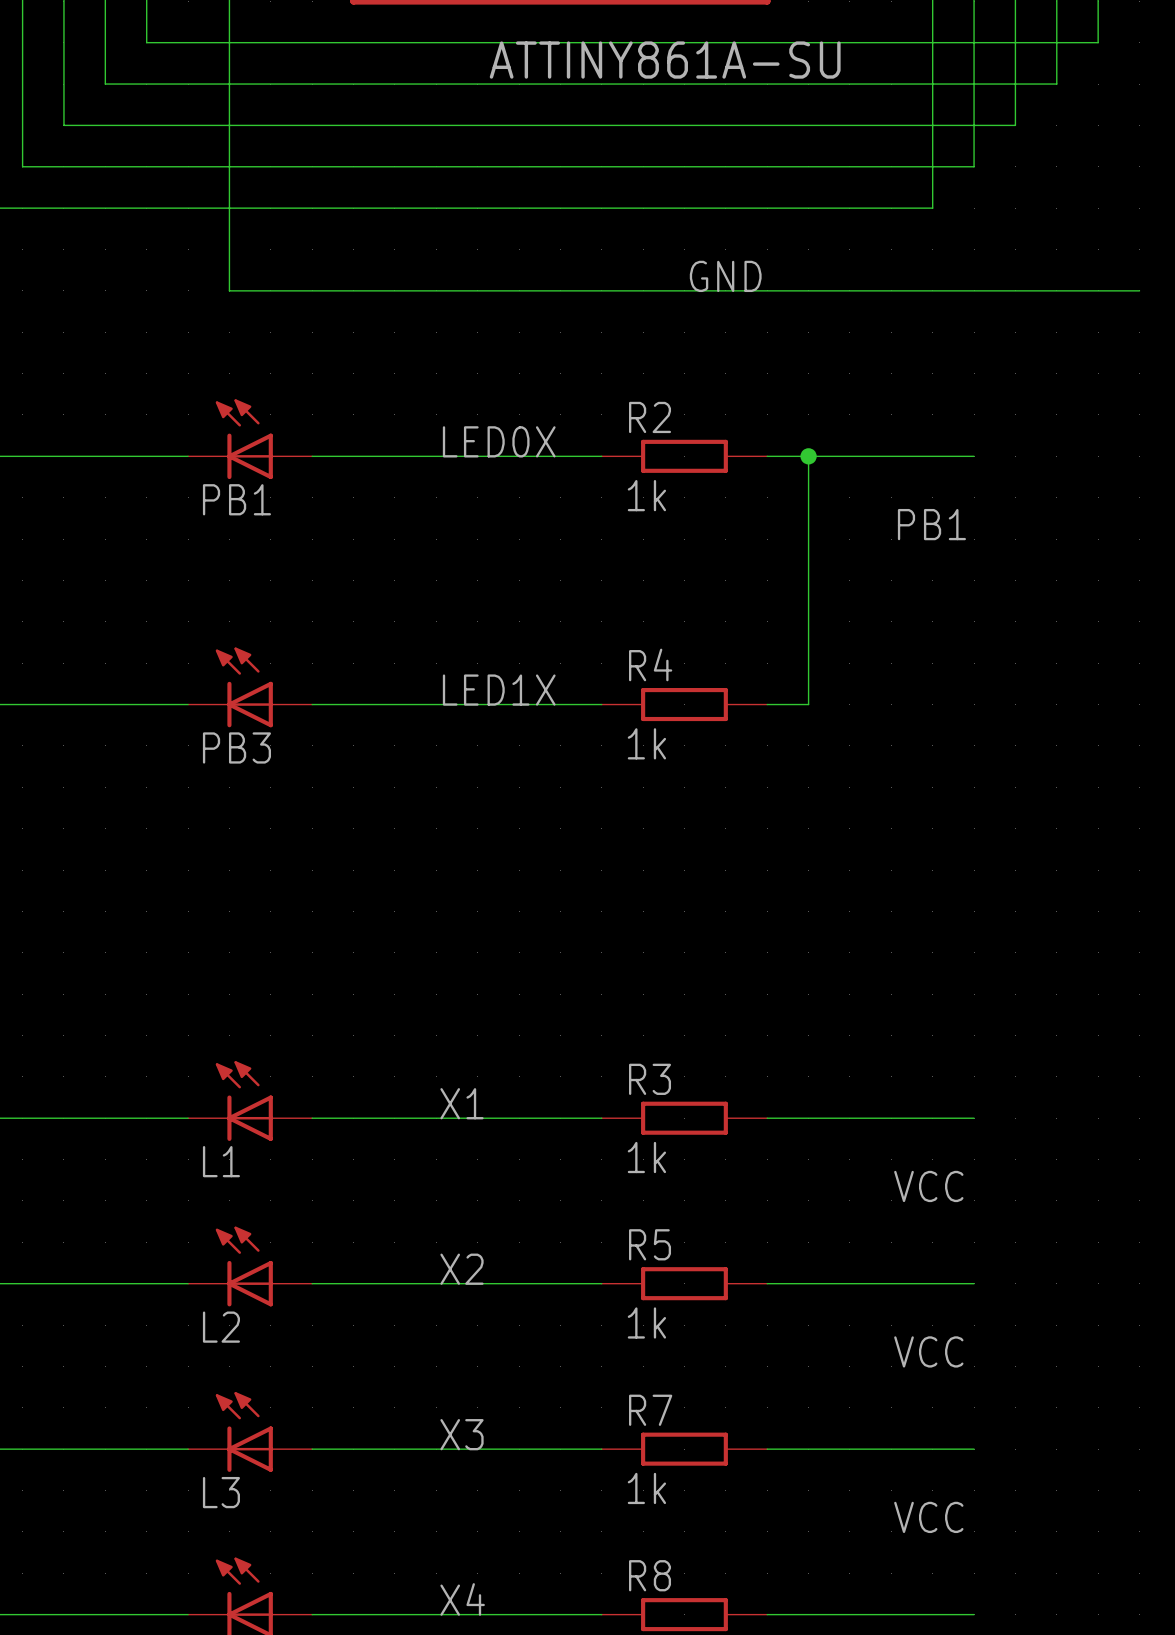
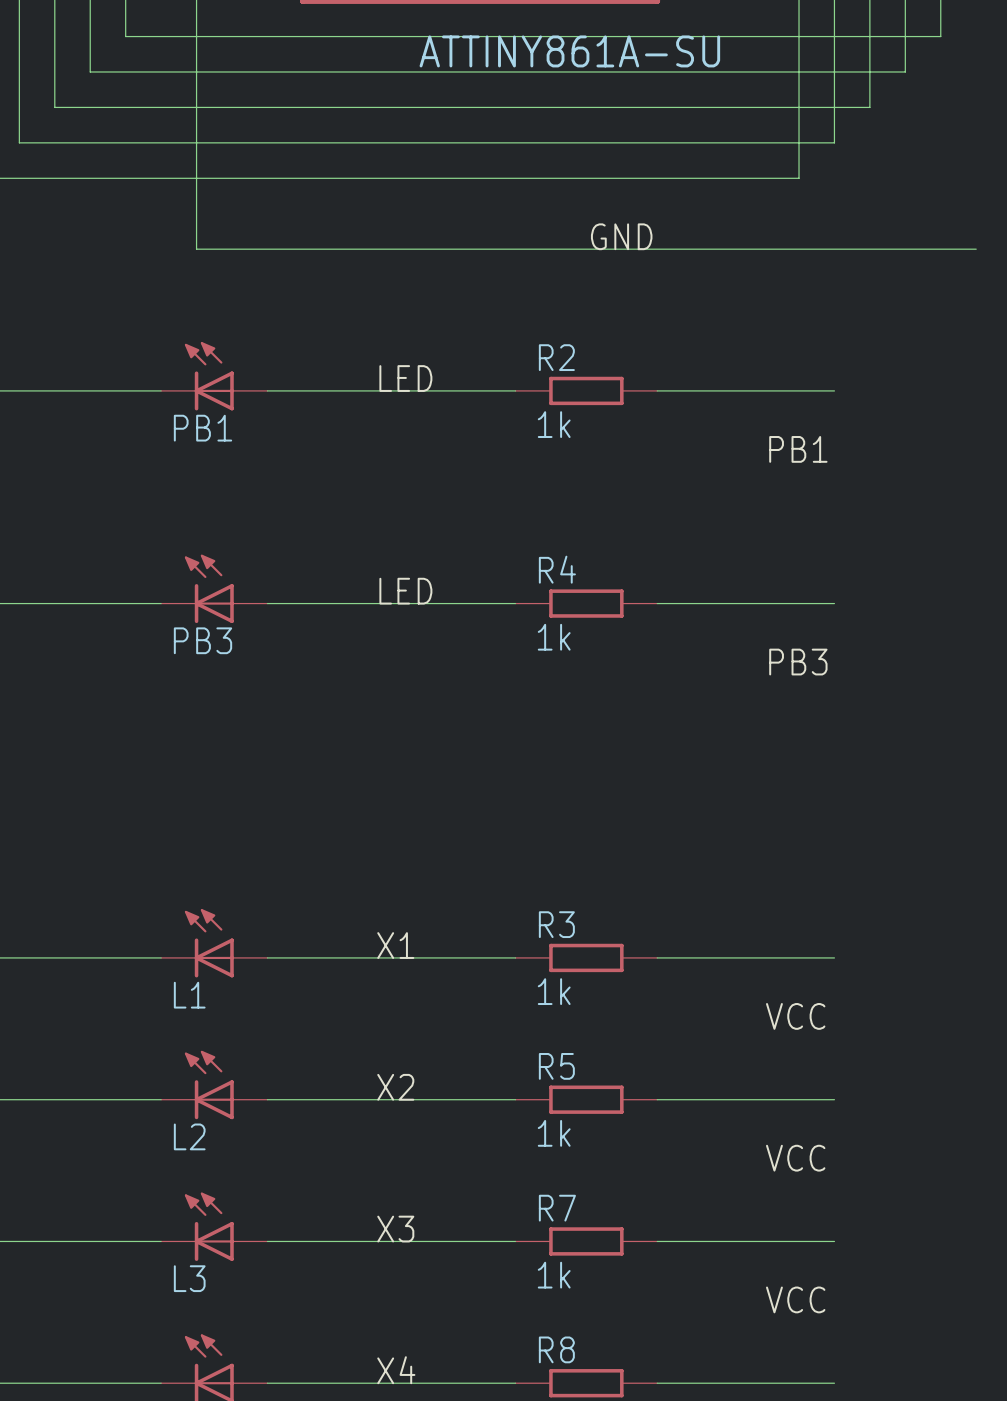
label: LED0X (499, 441) -> LED (405, 378)
wire: (808, 456) (808, 704) -> (834, 603) (692, 603)
junction: (808, 456) -> none
label: LED1X (499, 690) -> LED (405, 591)
label: none -> PB3 (798, 662)

